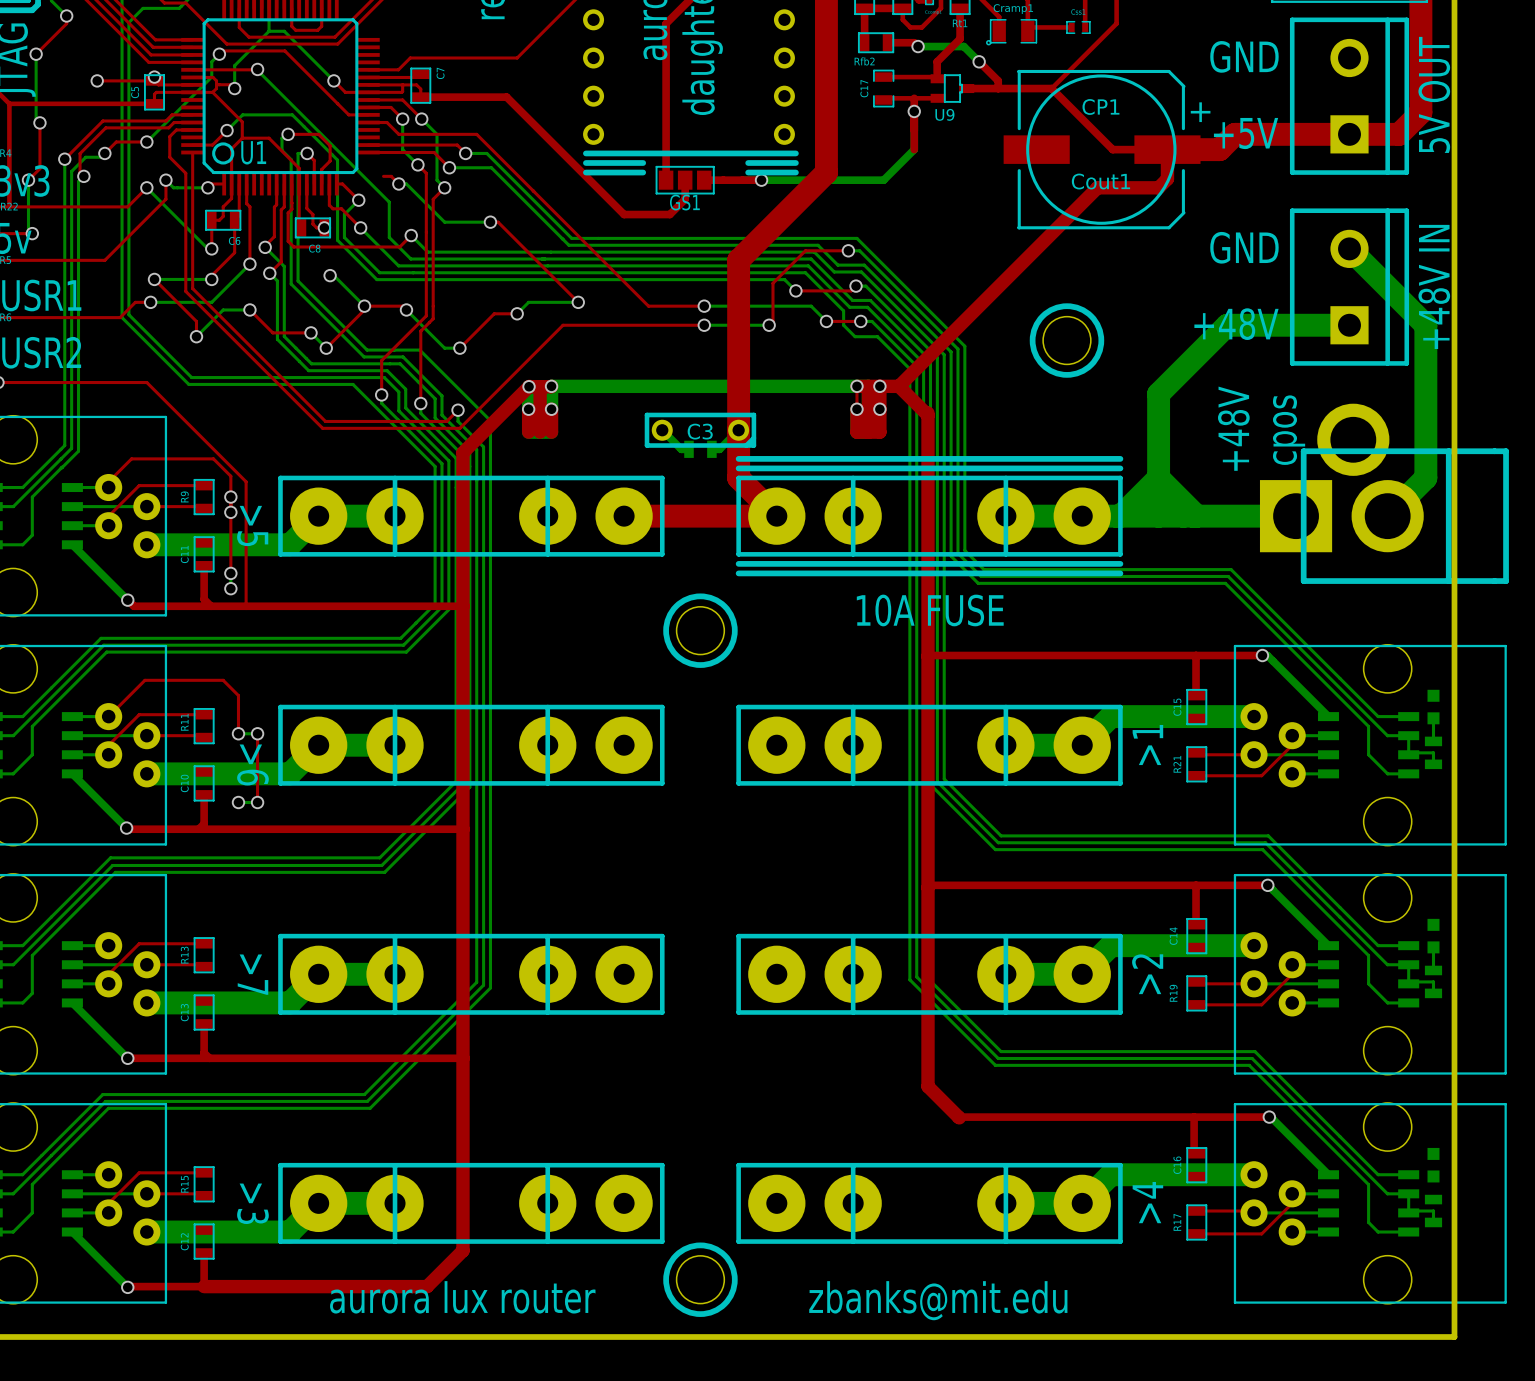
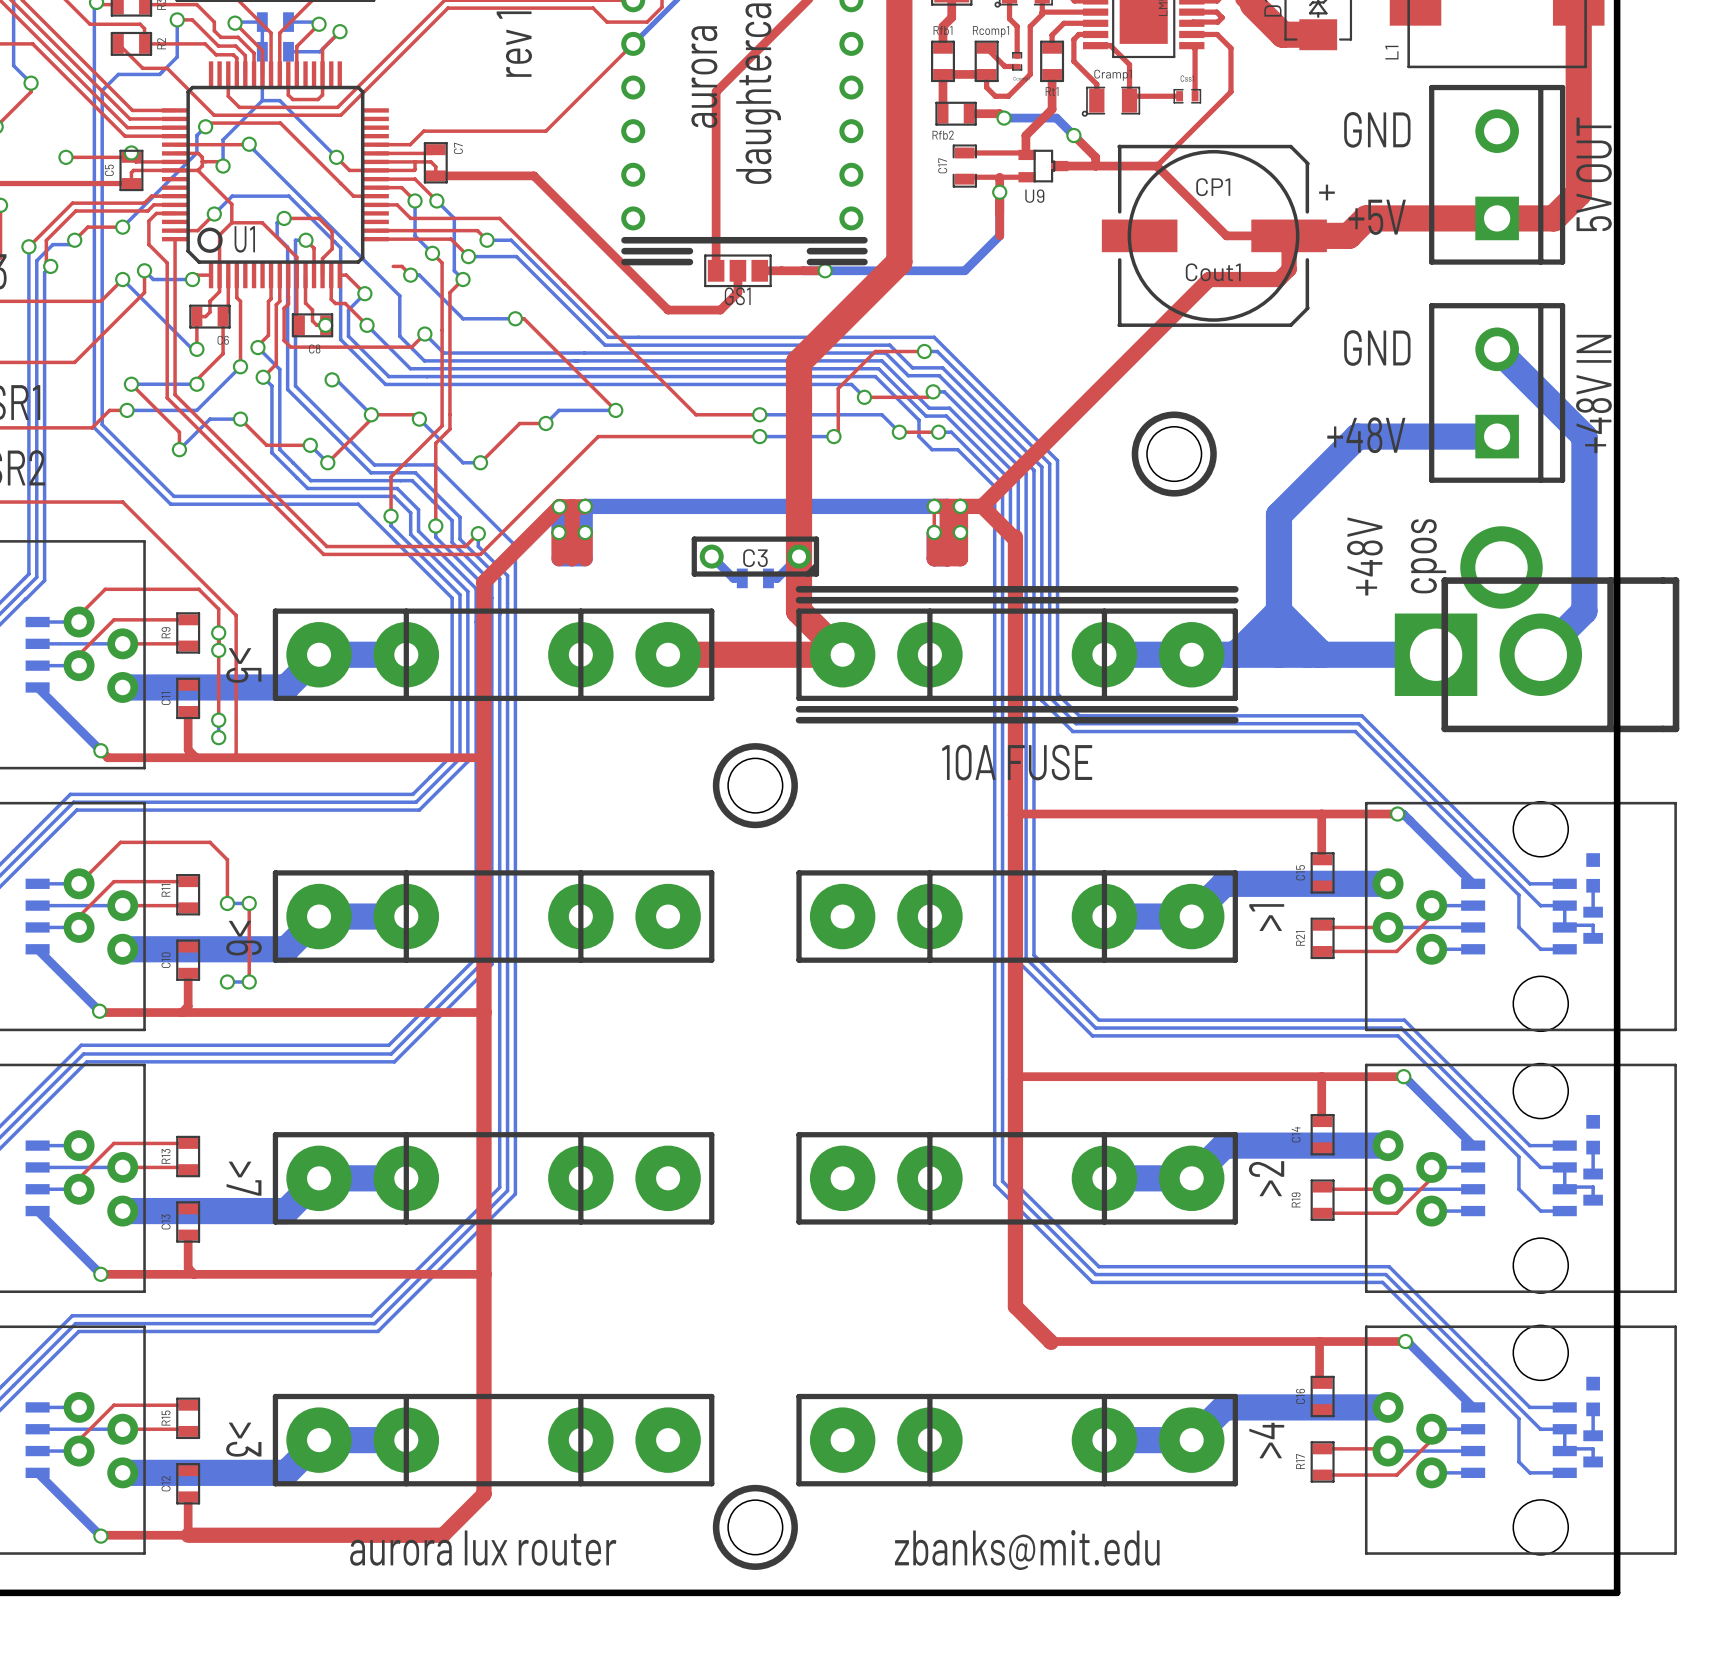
bottom track: none -> (1593, 1409) (1593, 1435)

